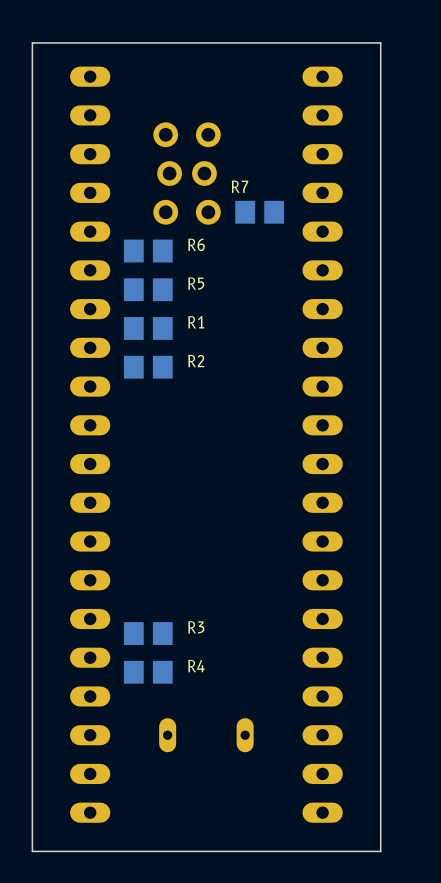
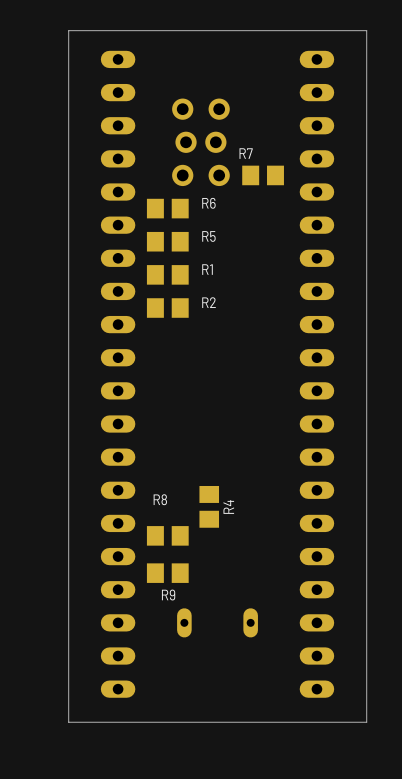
R3 name: R3 (196, 627) -> R8 (160, 499)
R4 rotation: 0° (148, 672) -> 90° clockwise (209, 506)
R4 position: (148, 672) -> (209, 506)
R9: none -> (167, 573)

